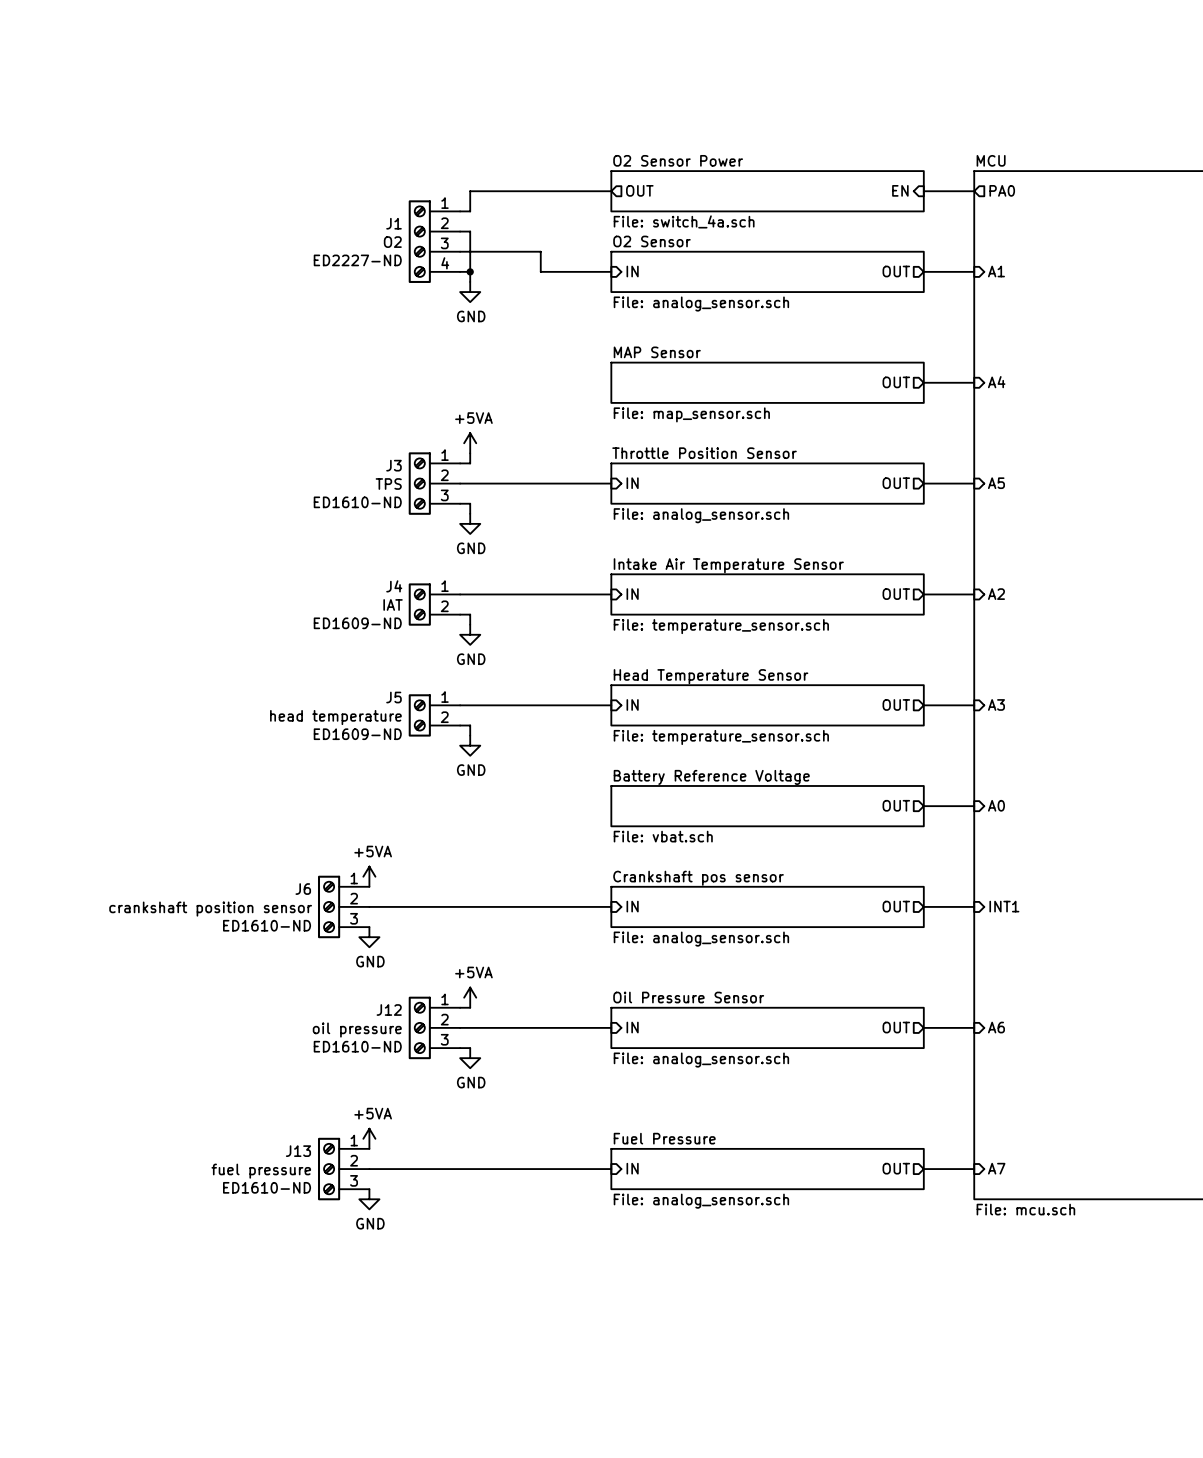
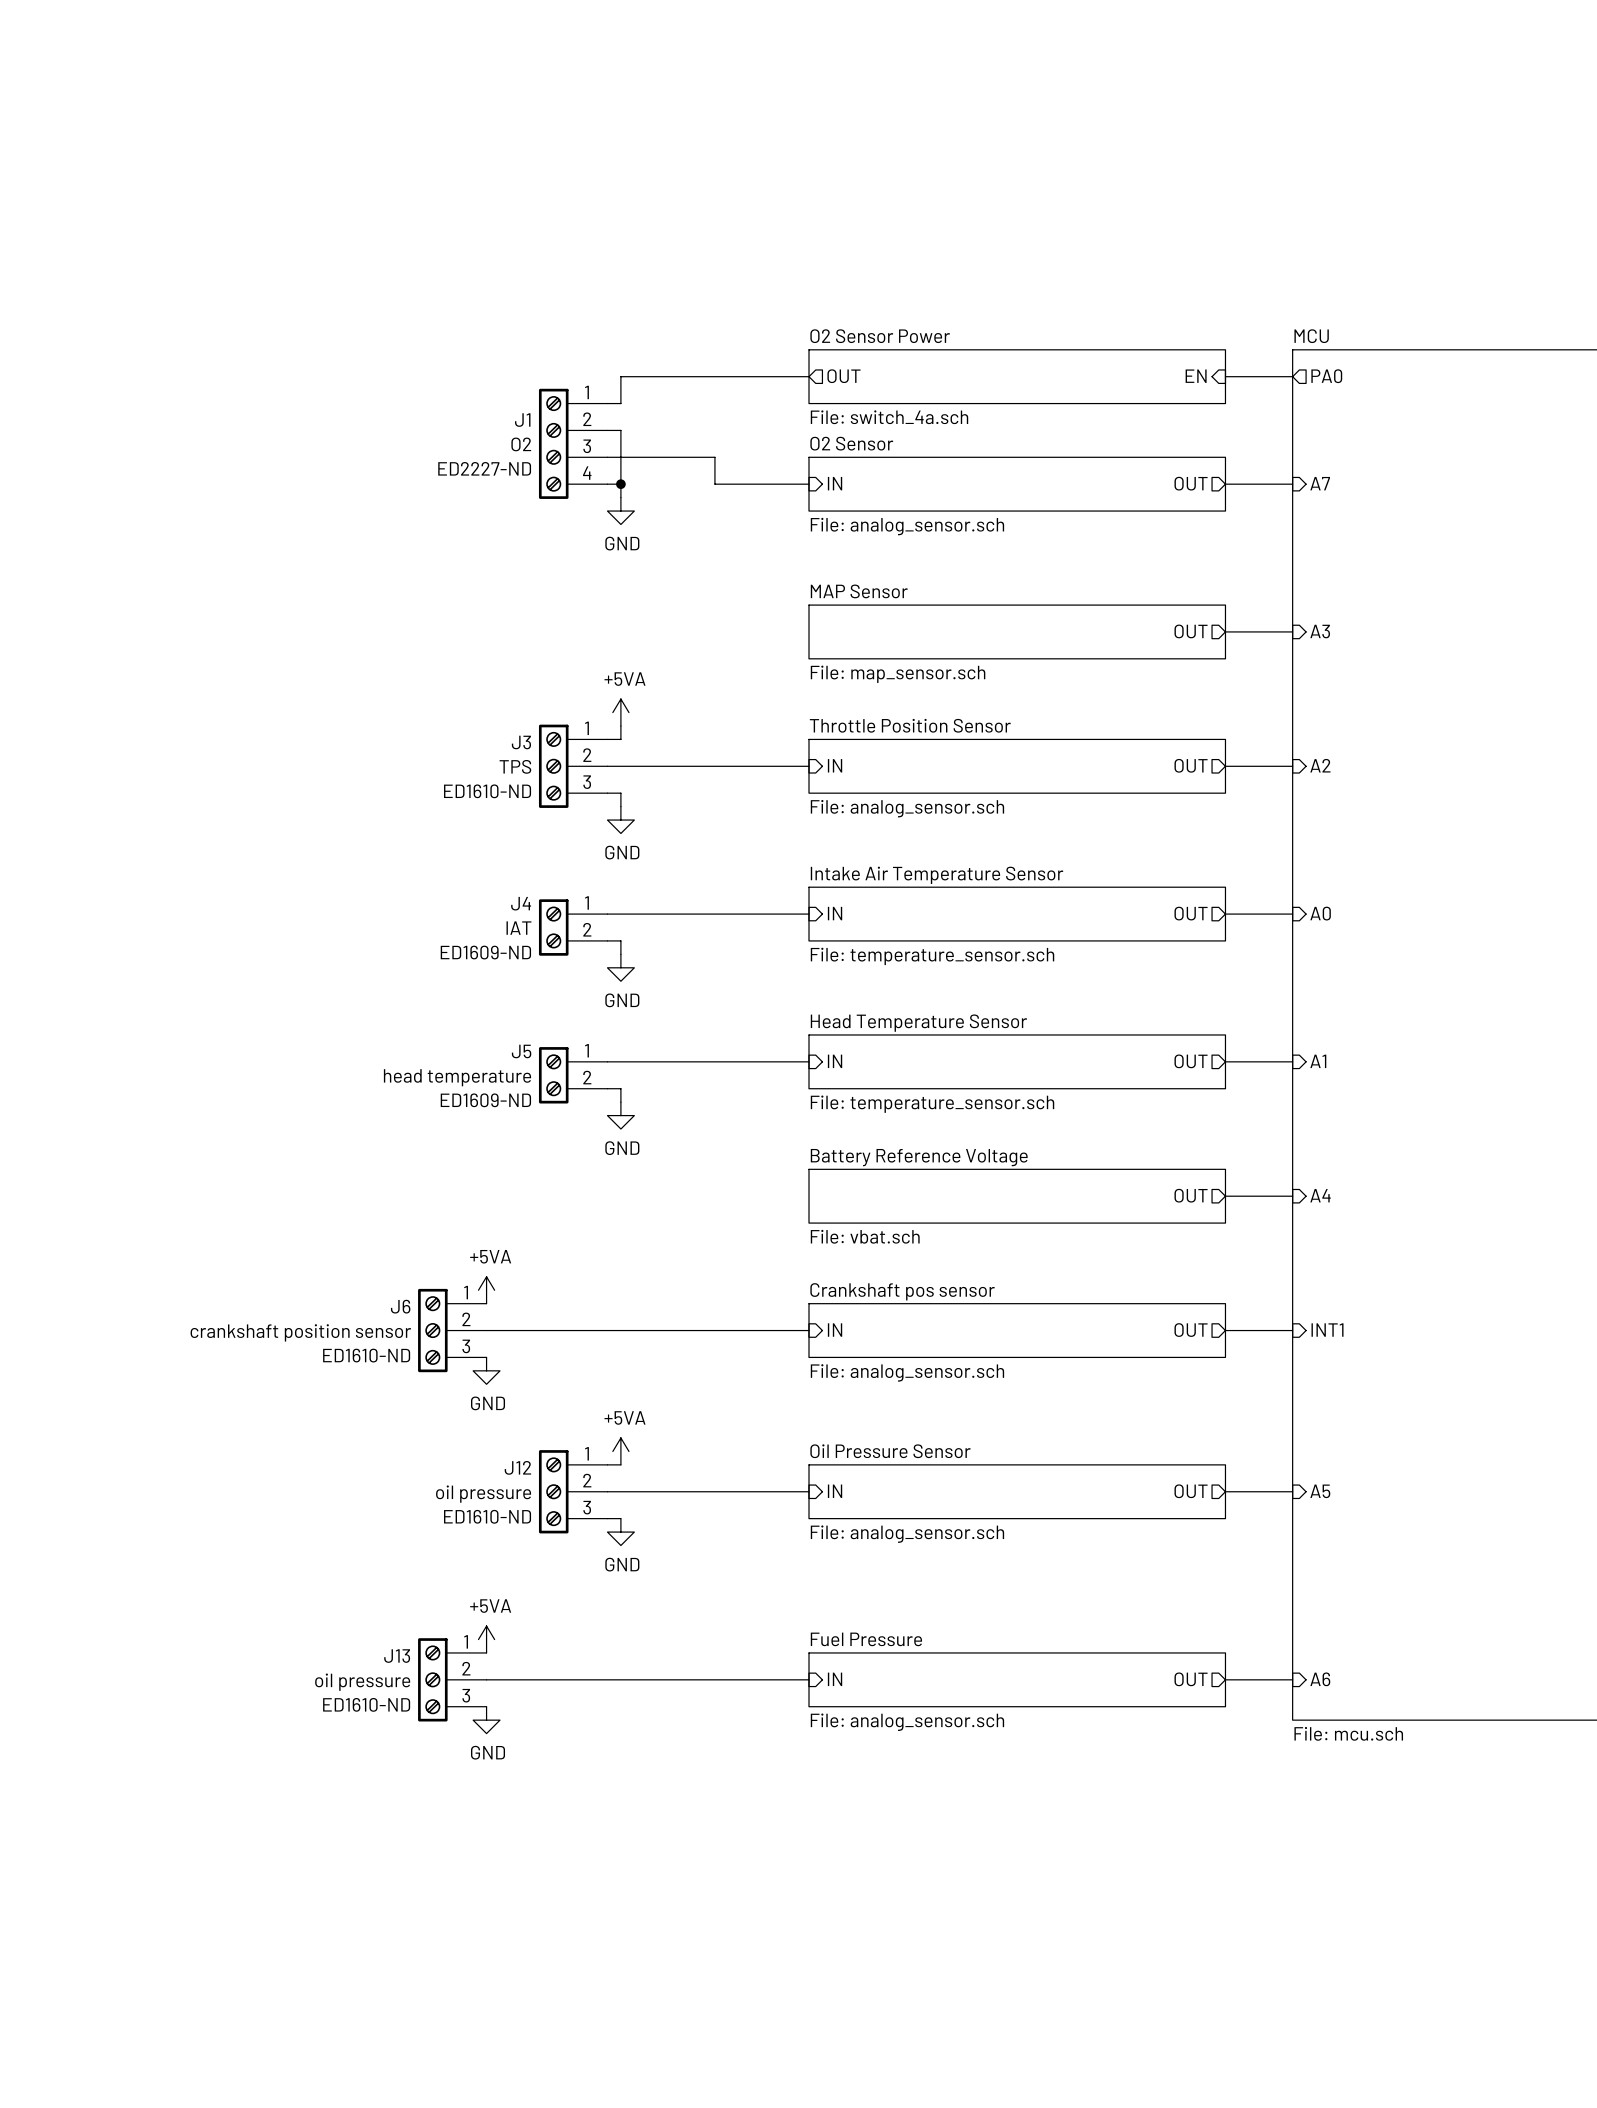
sheet pin: A1 (996, 271) -> A7 (1320, 483)
sheet pin: A4 (996, 382) -> A3 (1320, 631)
sheet pin: A5 (996, 483) -> A2 (1320, 765)
sheet pin: A2 (996, 594) -> A0 (1320, 913)
sheet pin: A3 (996, 704) -> A1 (1318, 1061)
sheet pin: A0 (996, 805) -> A4 (1320, 1195)
sheet pin: A6 (996, 1027) -> A5 (1320, 1491)
sheet pin: A7 (996, 1168) -> A6 (1320, 1679)
J13 value: fuel pressure (261, 1171) -> oil pressure (362, 1682)

